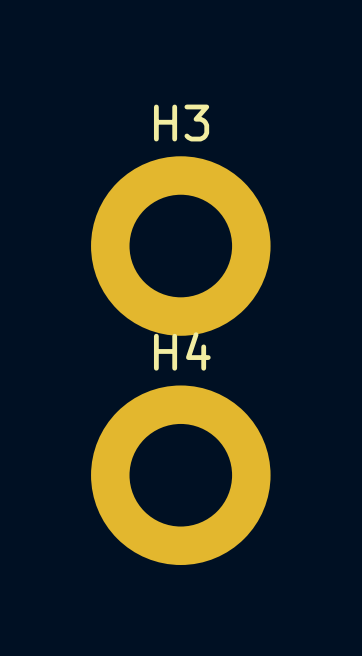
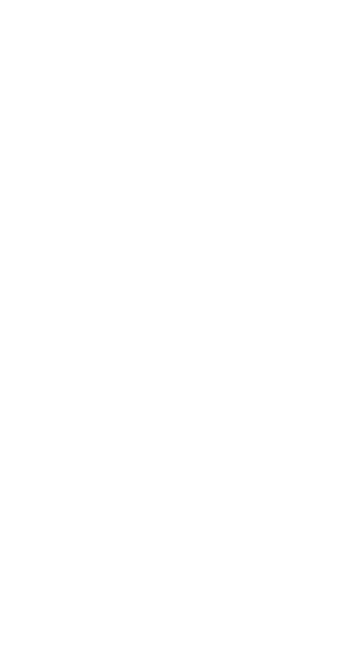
H3: (180, 246) -> none
H4: (180, 475) -> none

